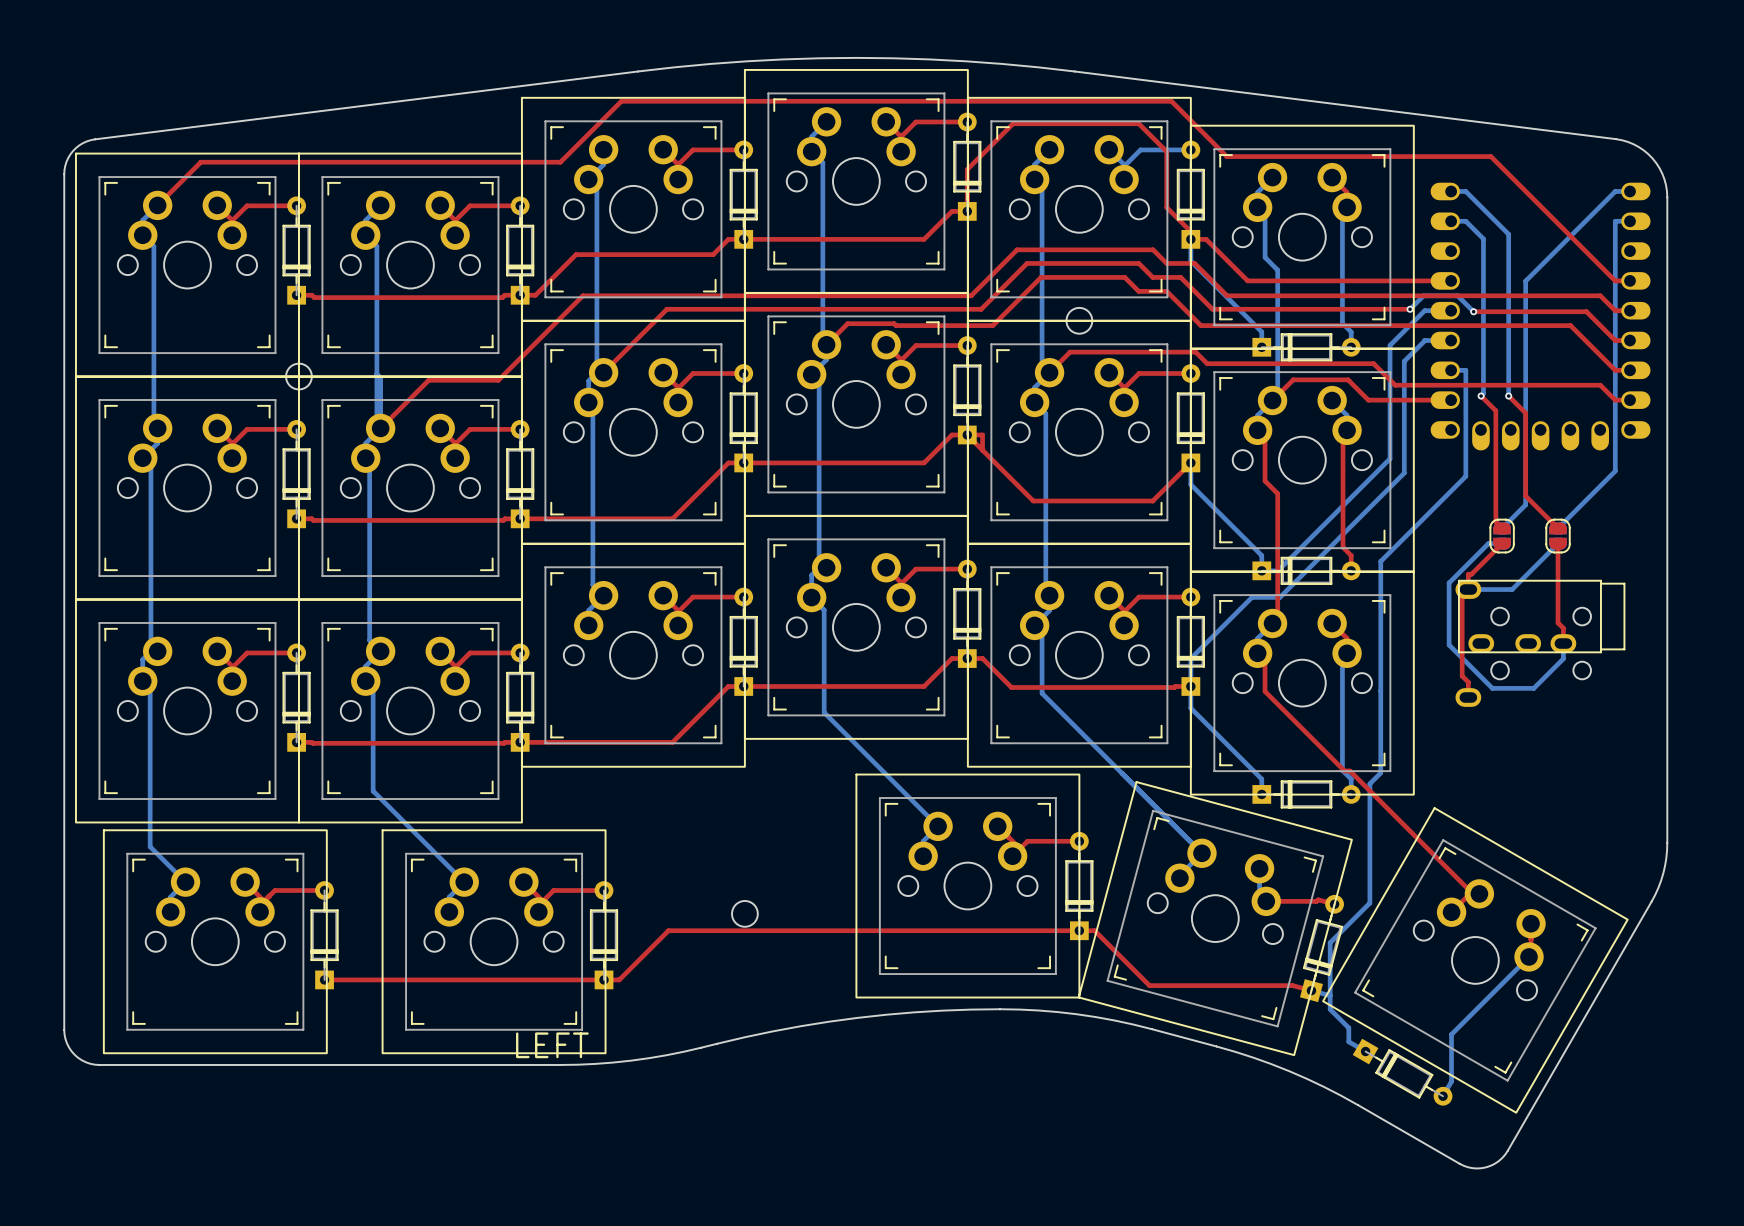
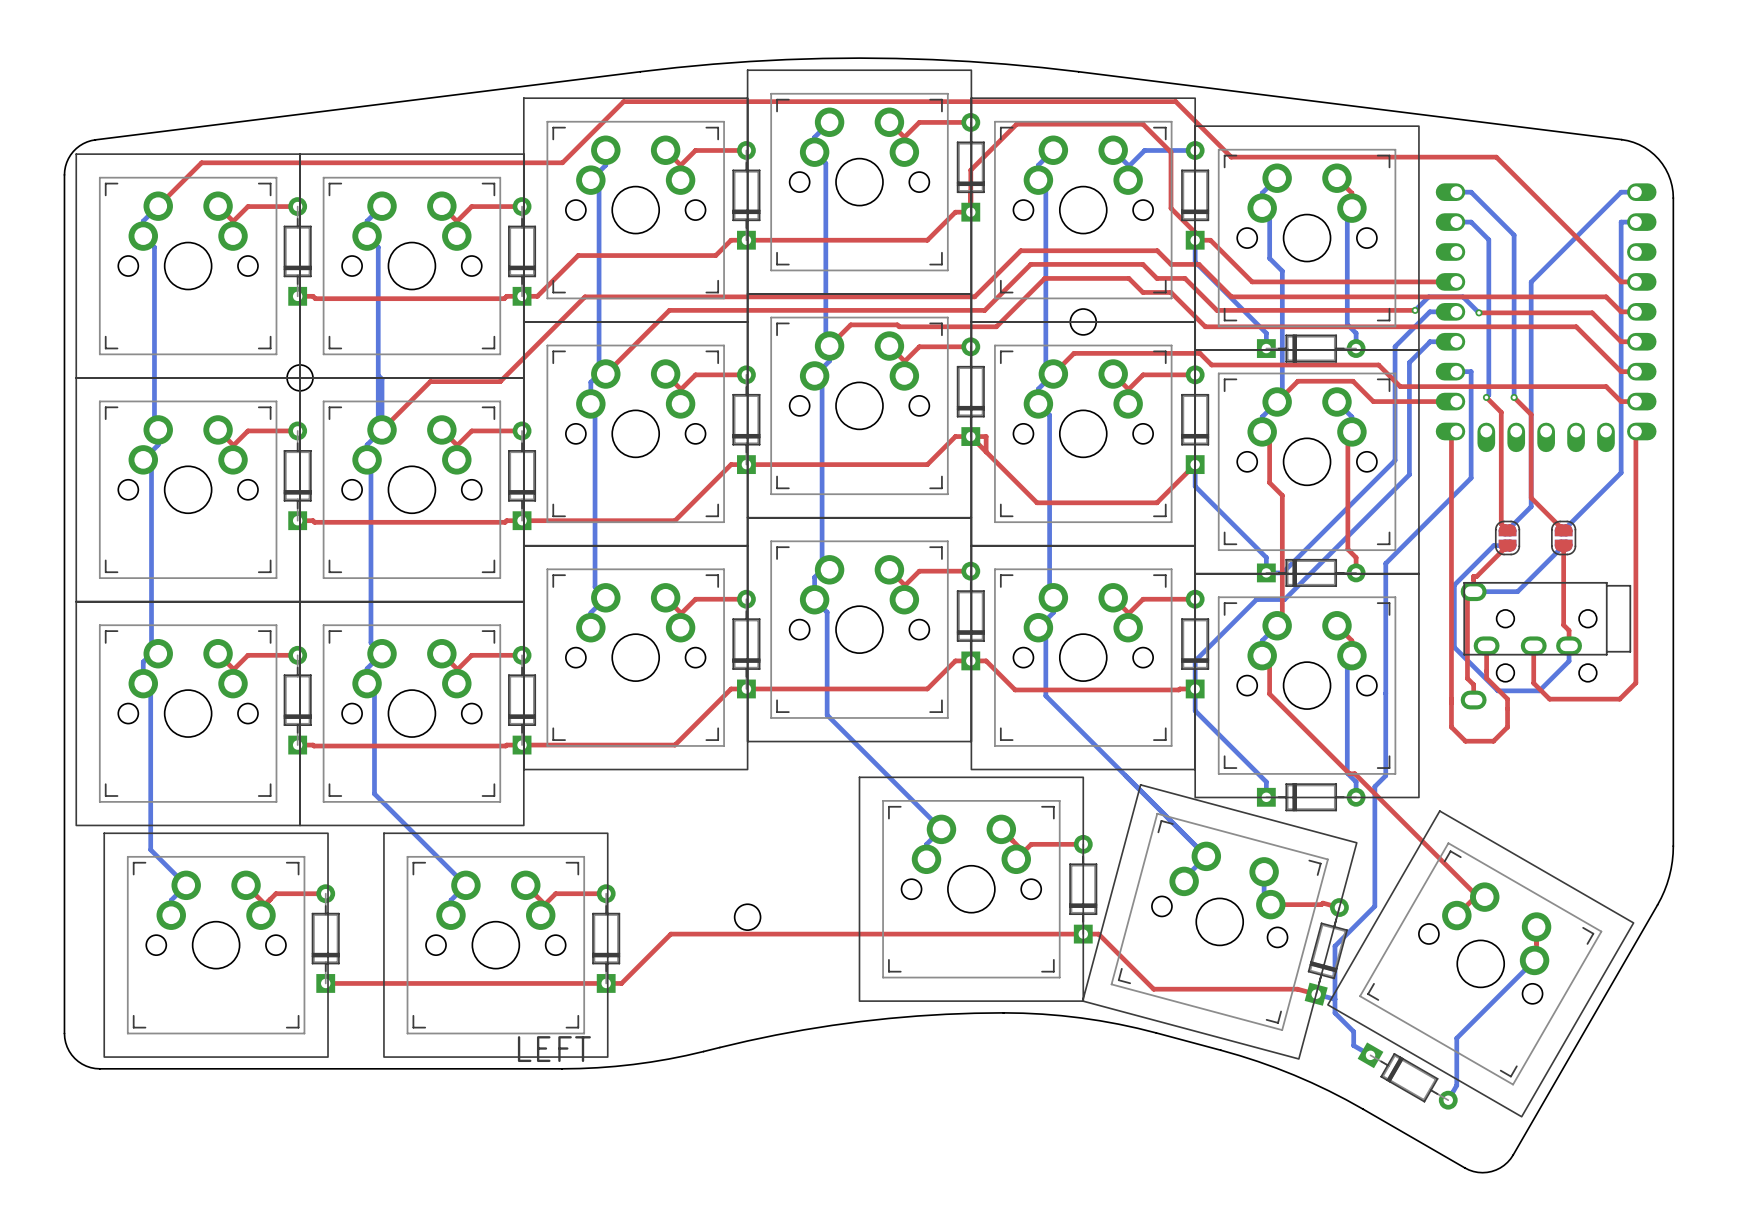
top track: none -> (1456, 431) (1451, 436) (1451, 727) (1465, 741) (1493, 741) (1507, 727) (1507, 699) (1486, 678) (1486, 645)
top track: none -> (1635, 431) (1635, 682) (1619, 699) (1549, 699) (1533, 683) (1533, 645)

